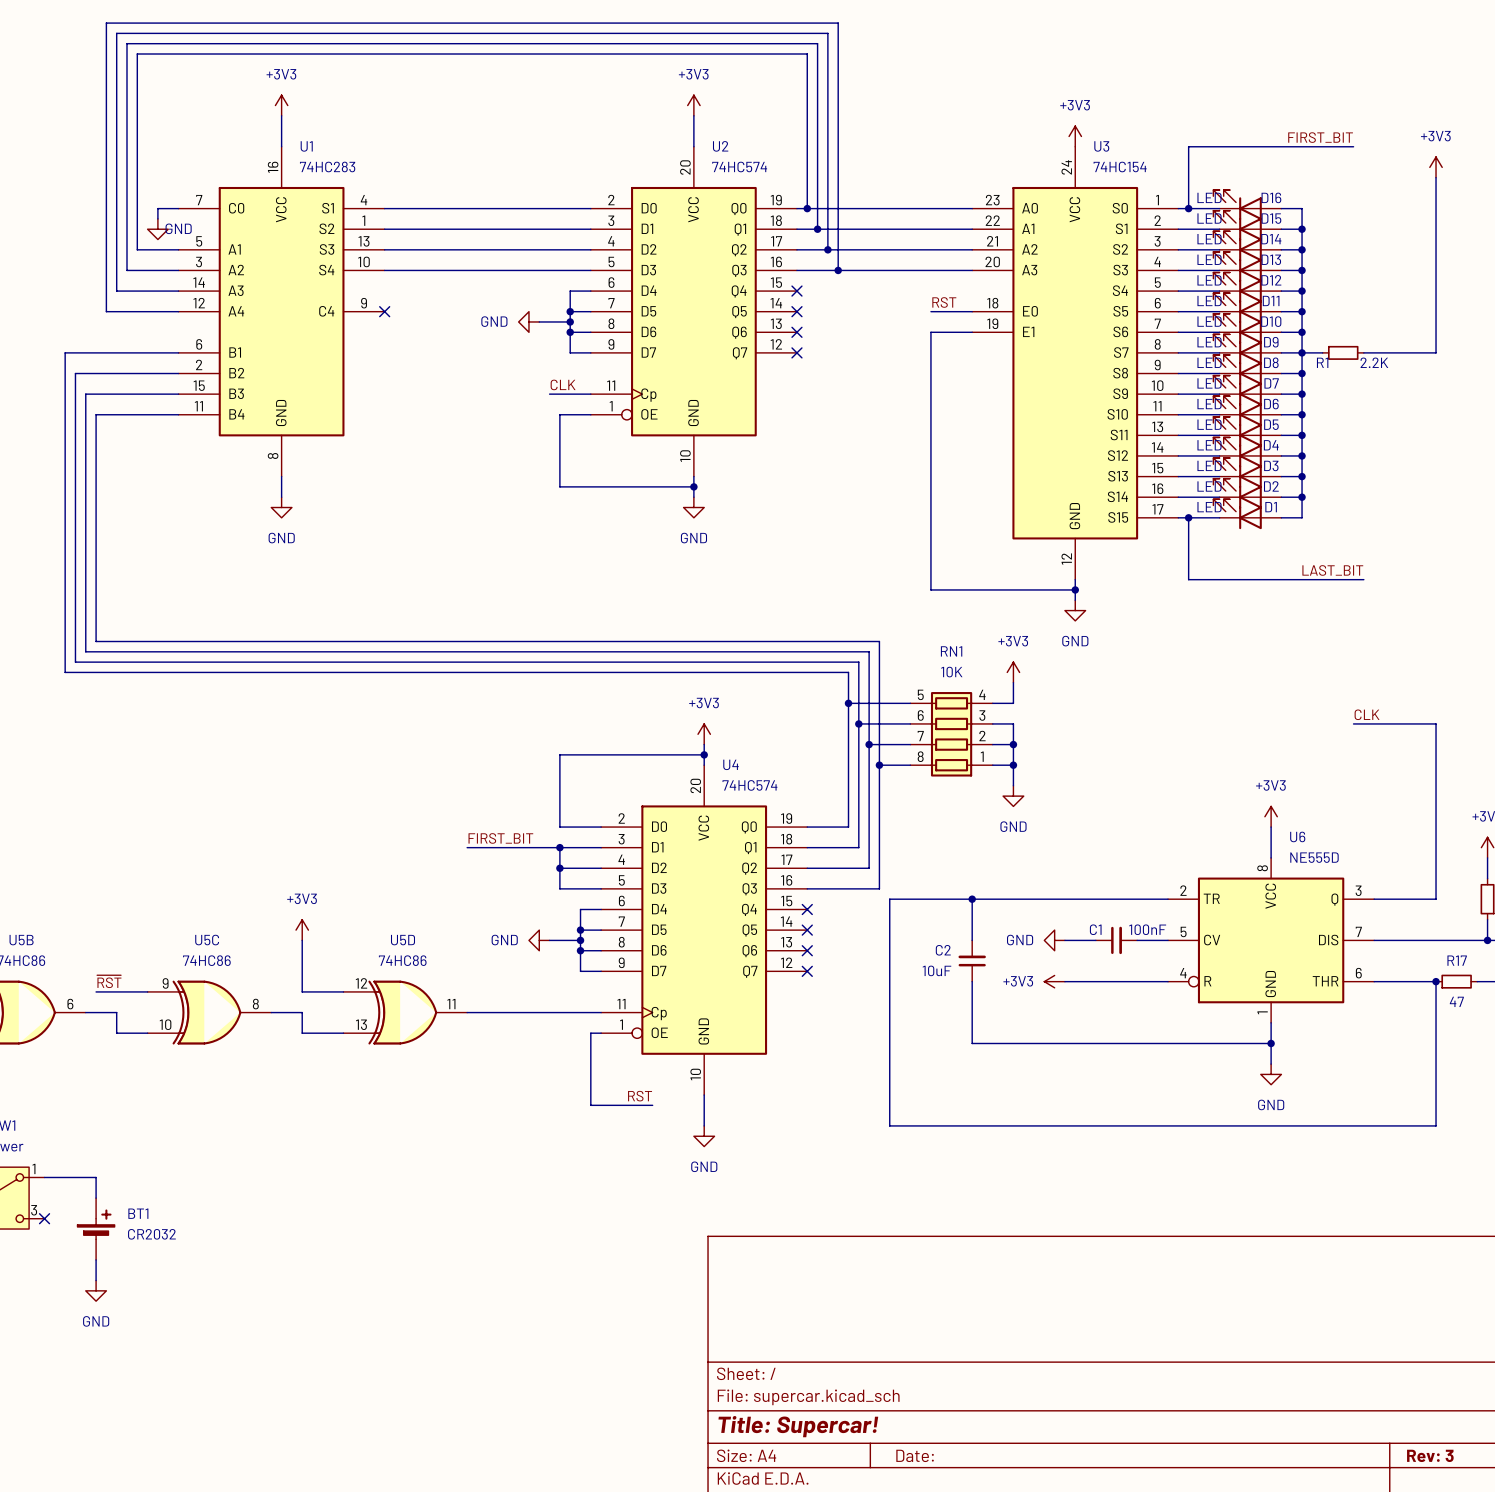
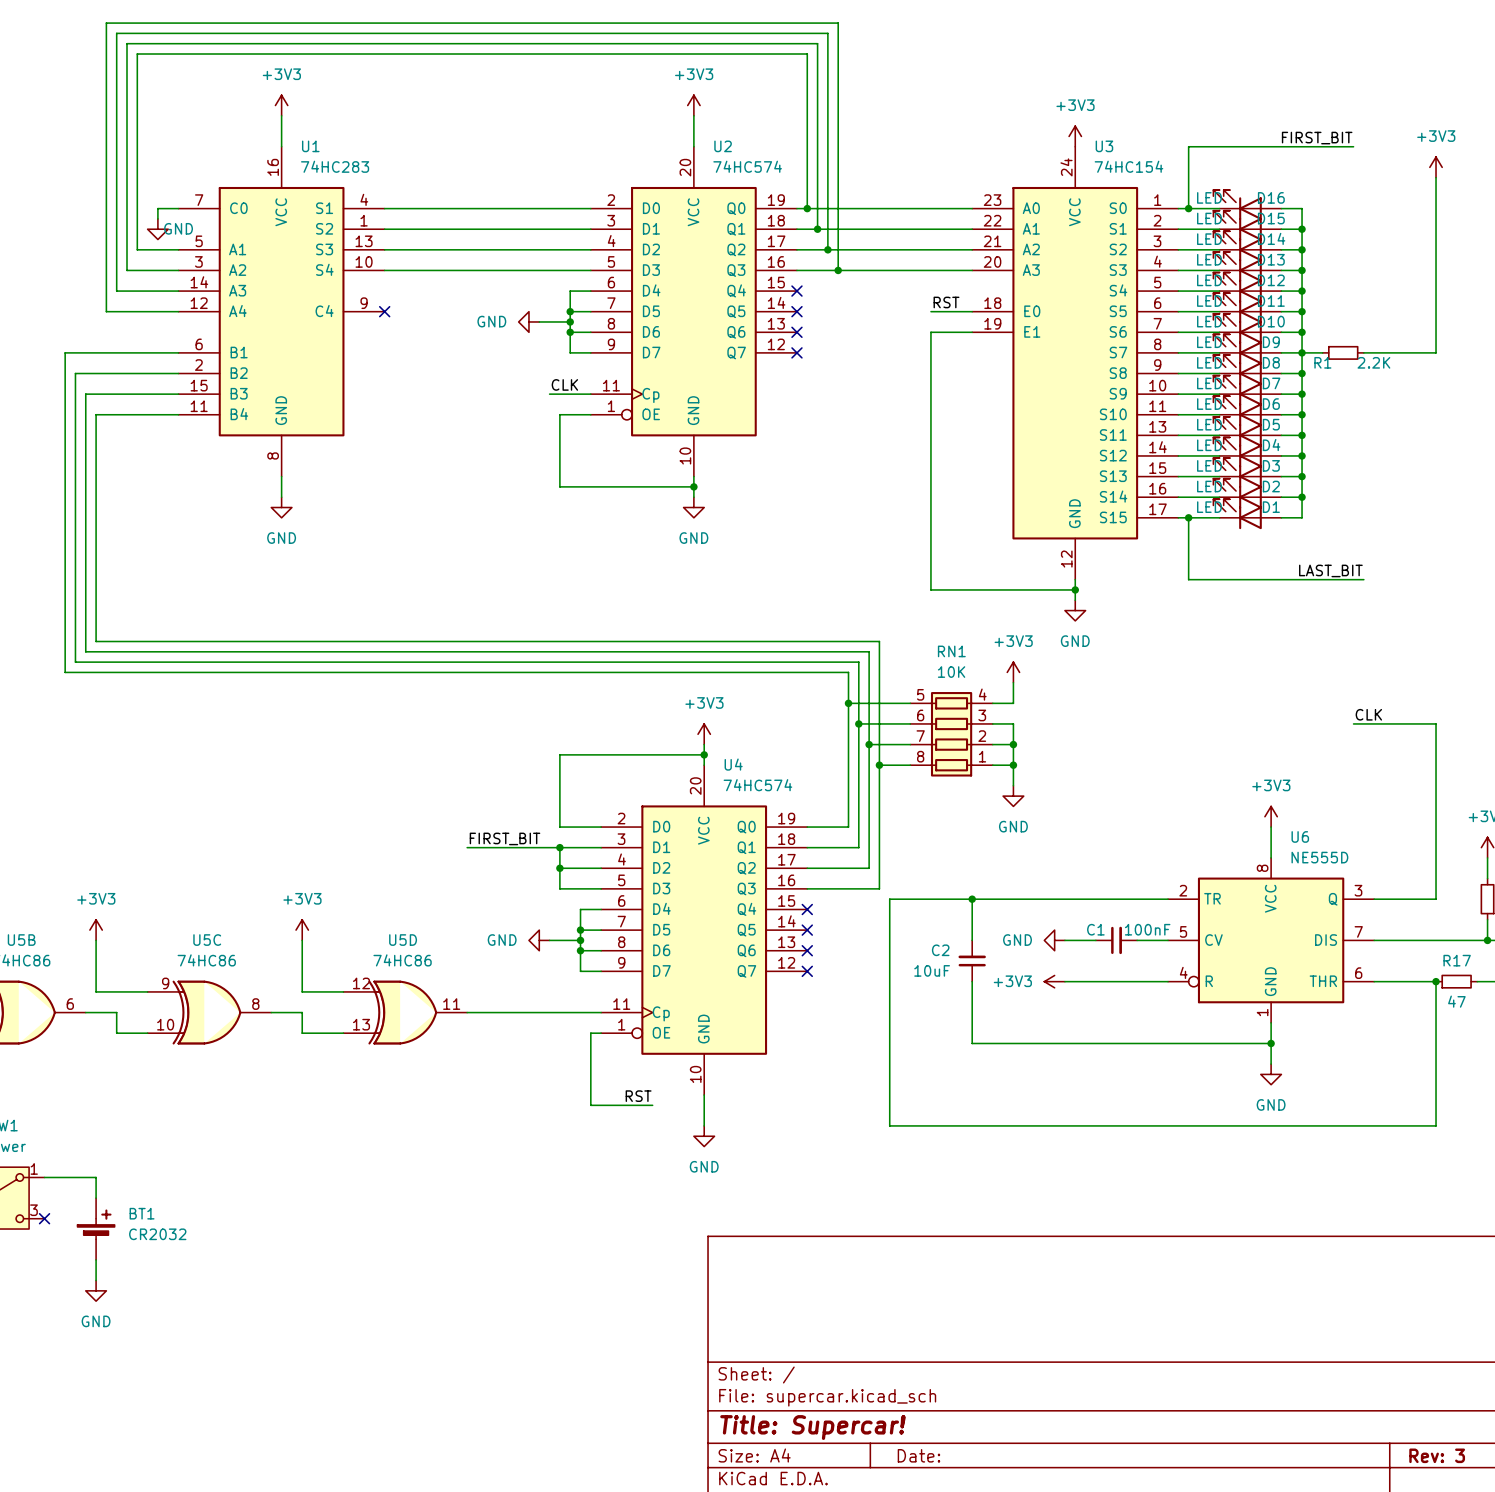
power symbol: none -> +3V3 (96, 930)
wire: none -> (96, 940) (96, 991)
label: ~{RST} (109, 981) -> none

